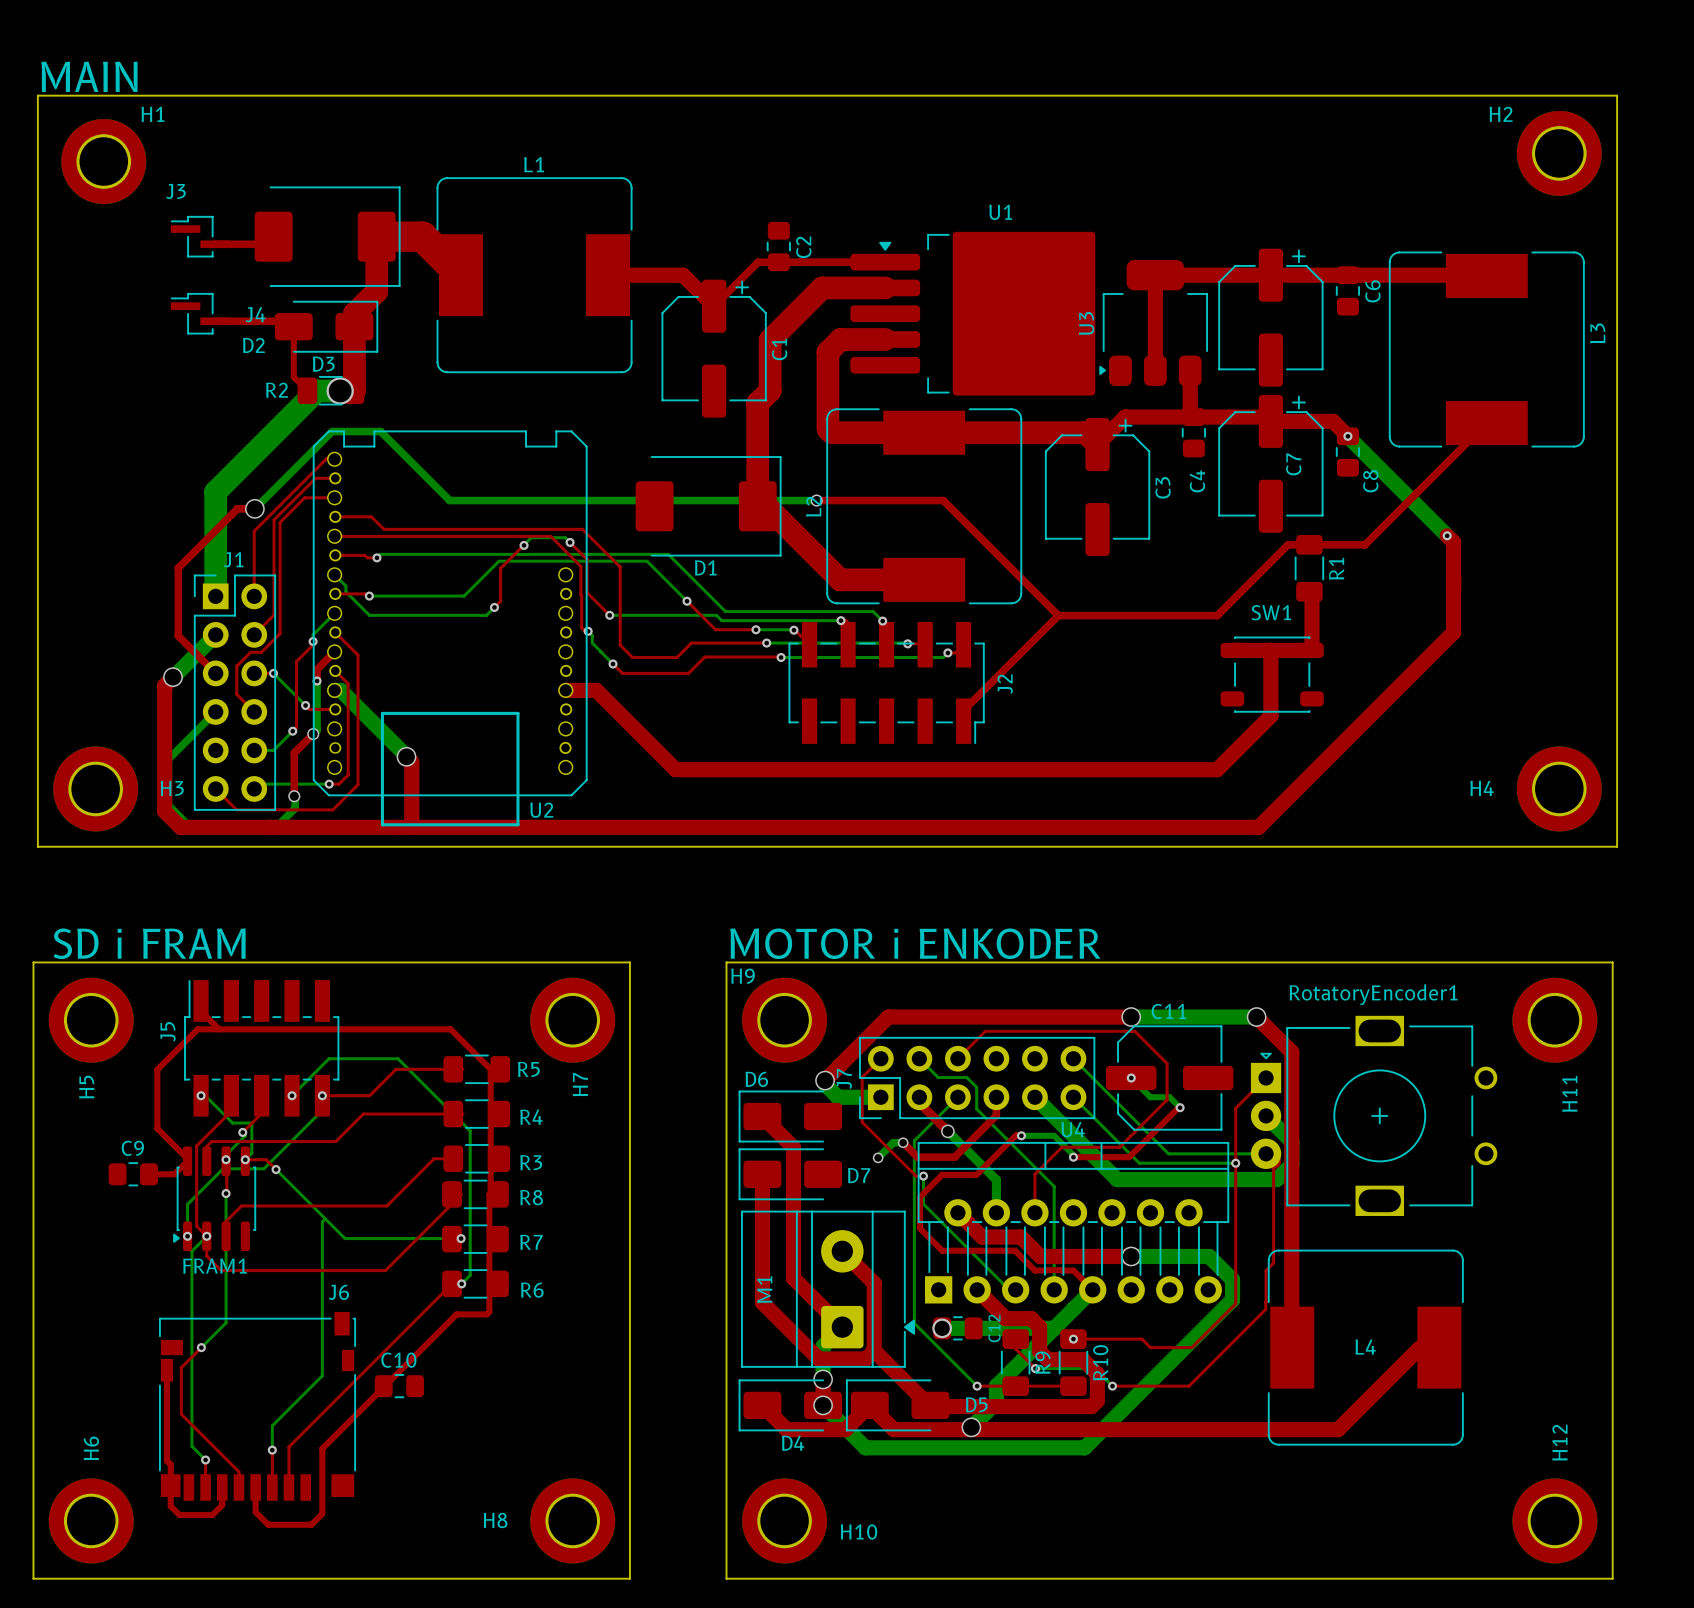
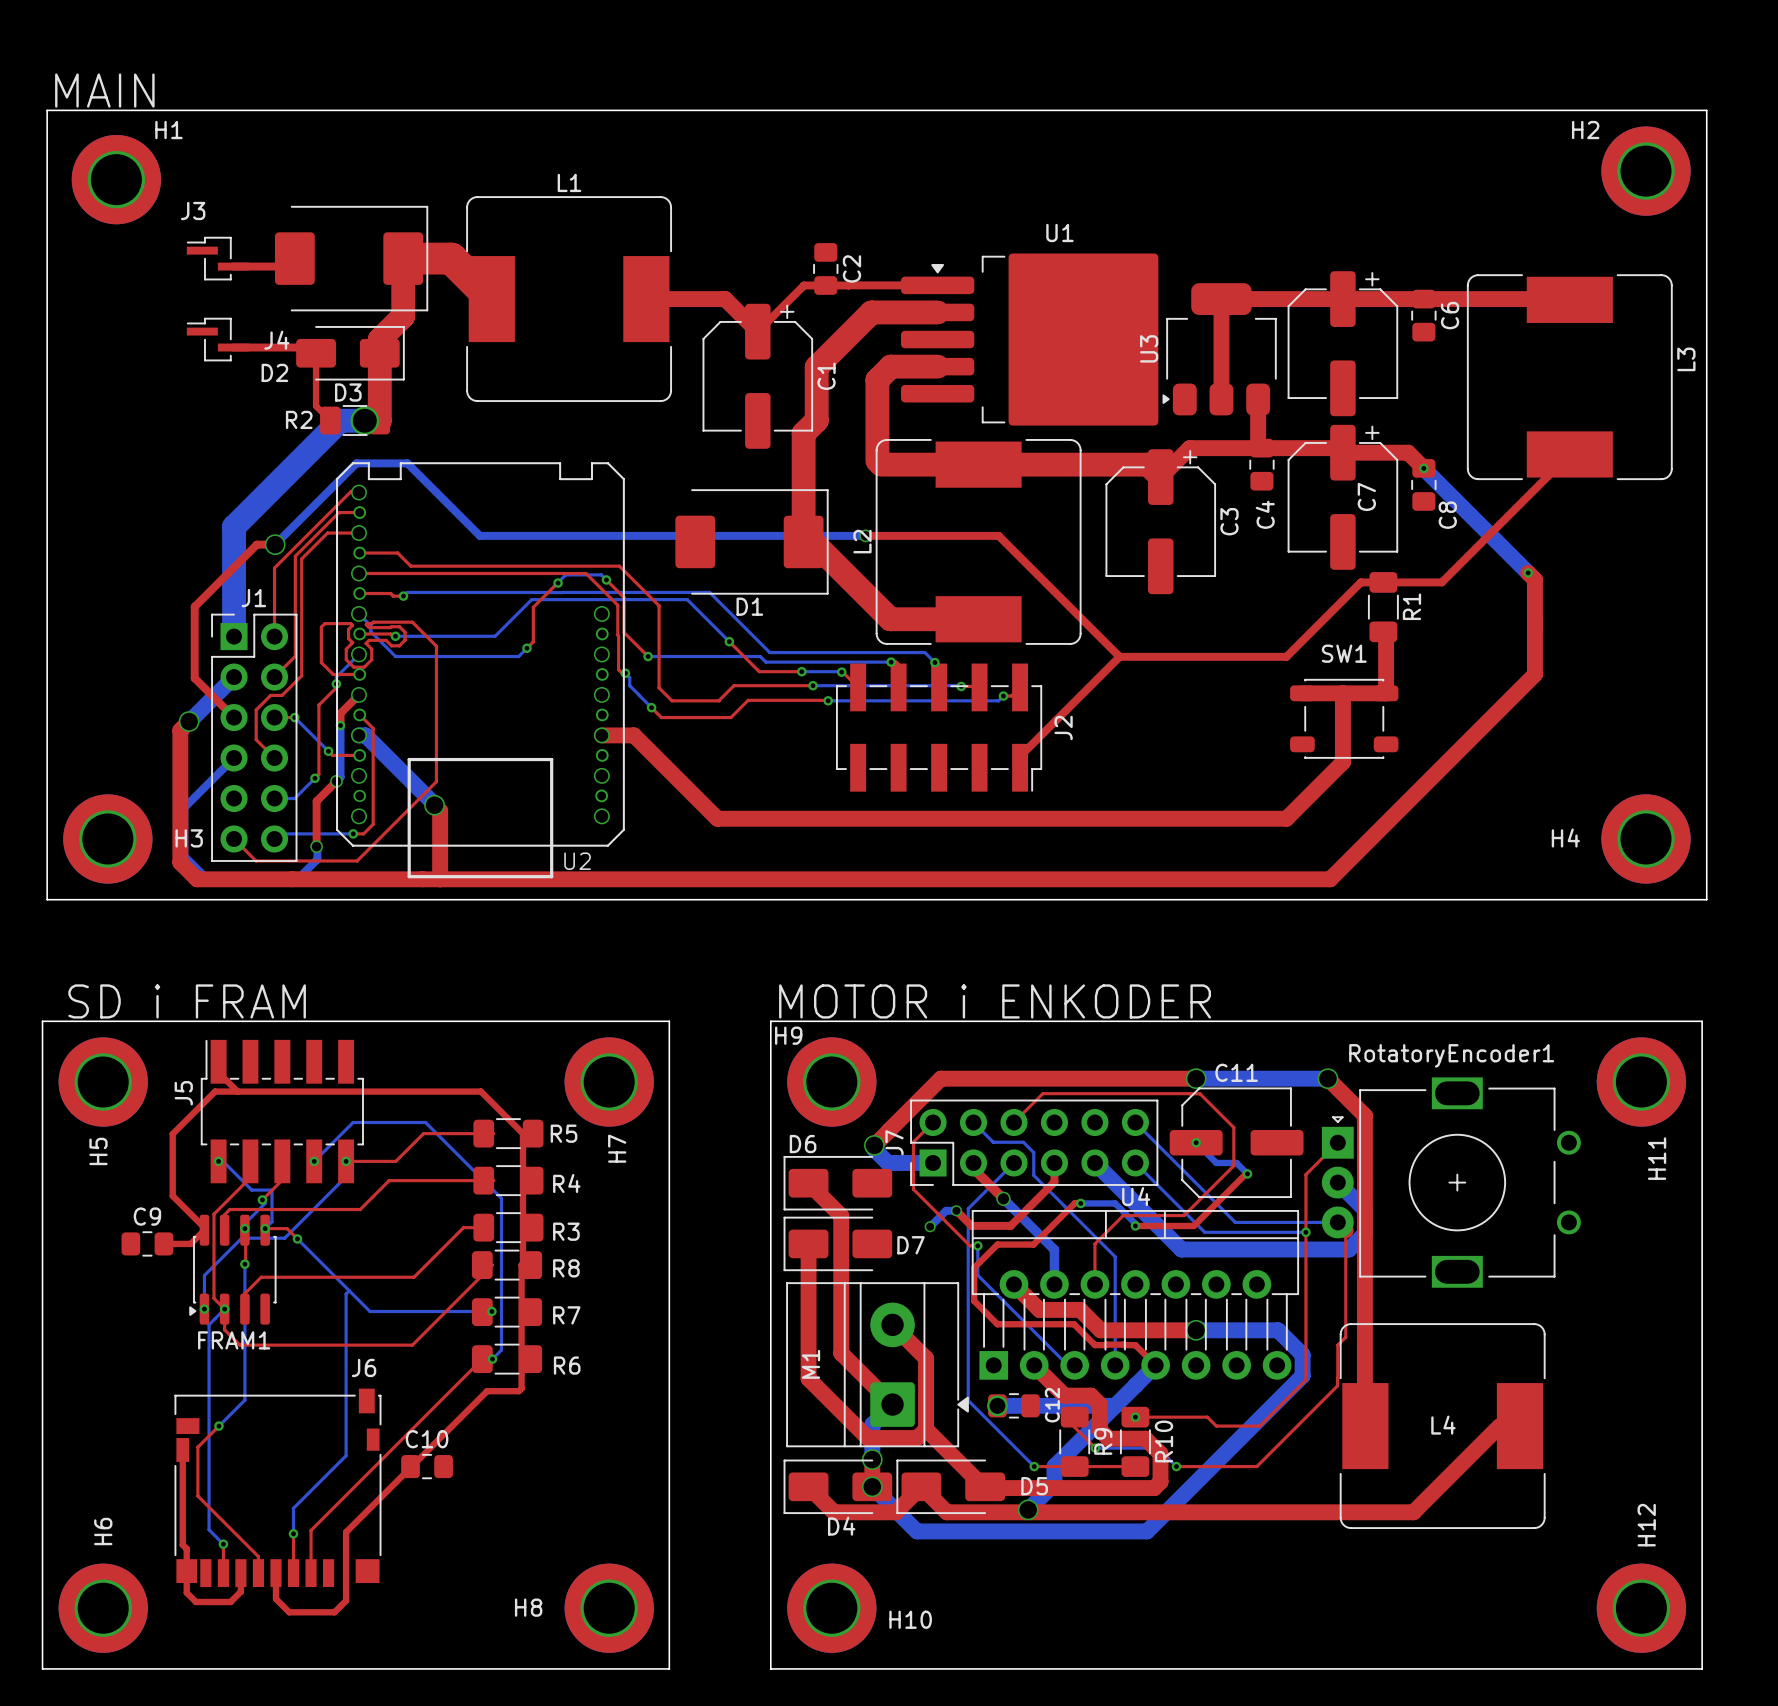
top track: (335, 632) (358, 655) (358, 784) -> (359, 674) (333, 674) (321, 662) (321, 627) (324, 623) (350, 623) (352, 625) (348, 629) (348, 638) (352, 642) (346, 649) (346, 659) (353, 667) (364, 667) (371, 659) (371, 649) (366, 643) (369, 640) (386, 640) (391, 645) (399, 645) (405, 640) (405, 632) (399, 626) (369, 627) (367, 623) (412, 622) (436, 646) (436, 781) (383, 834)

